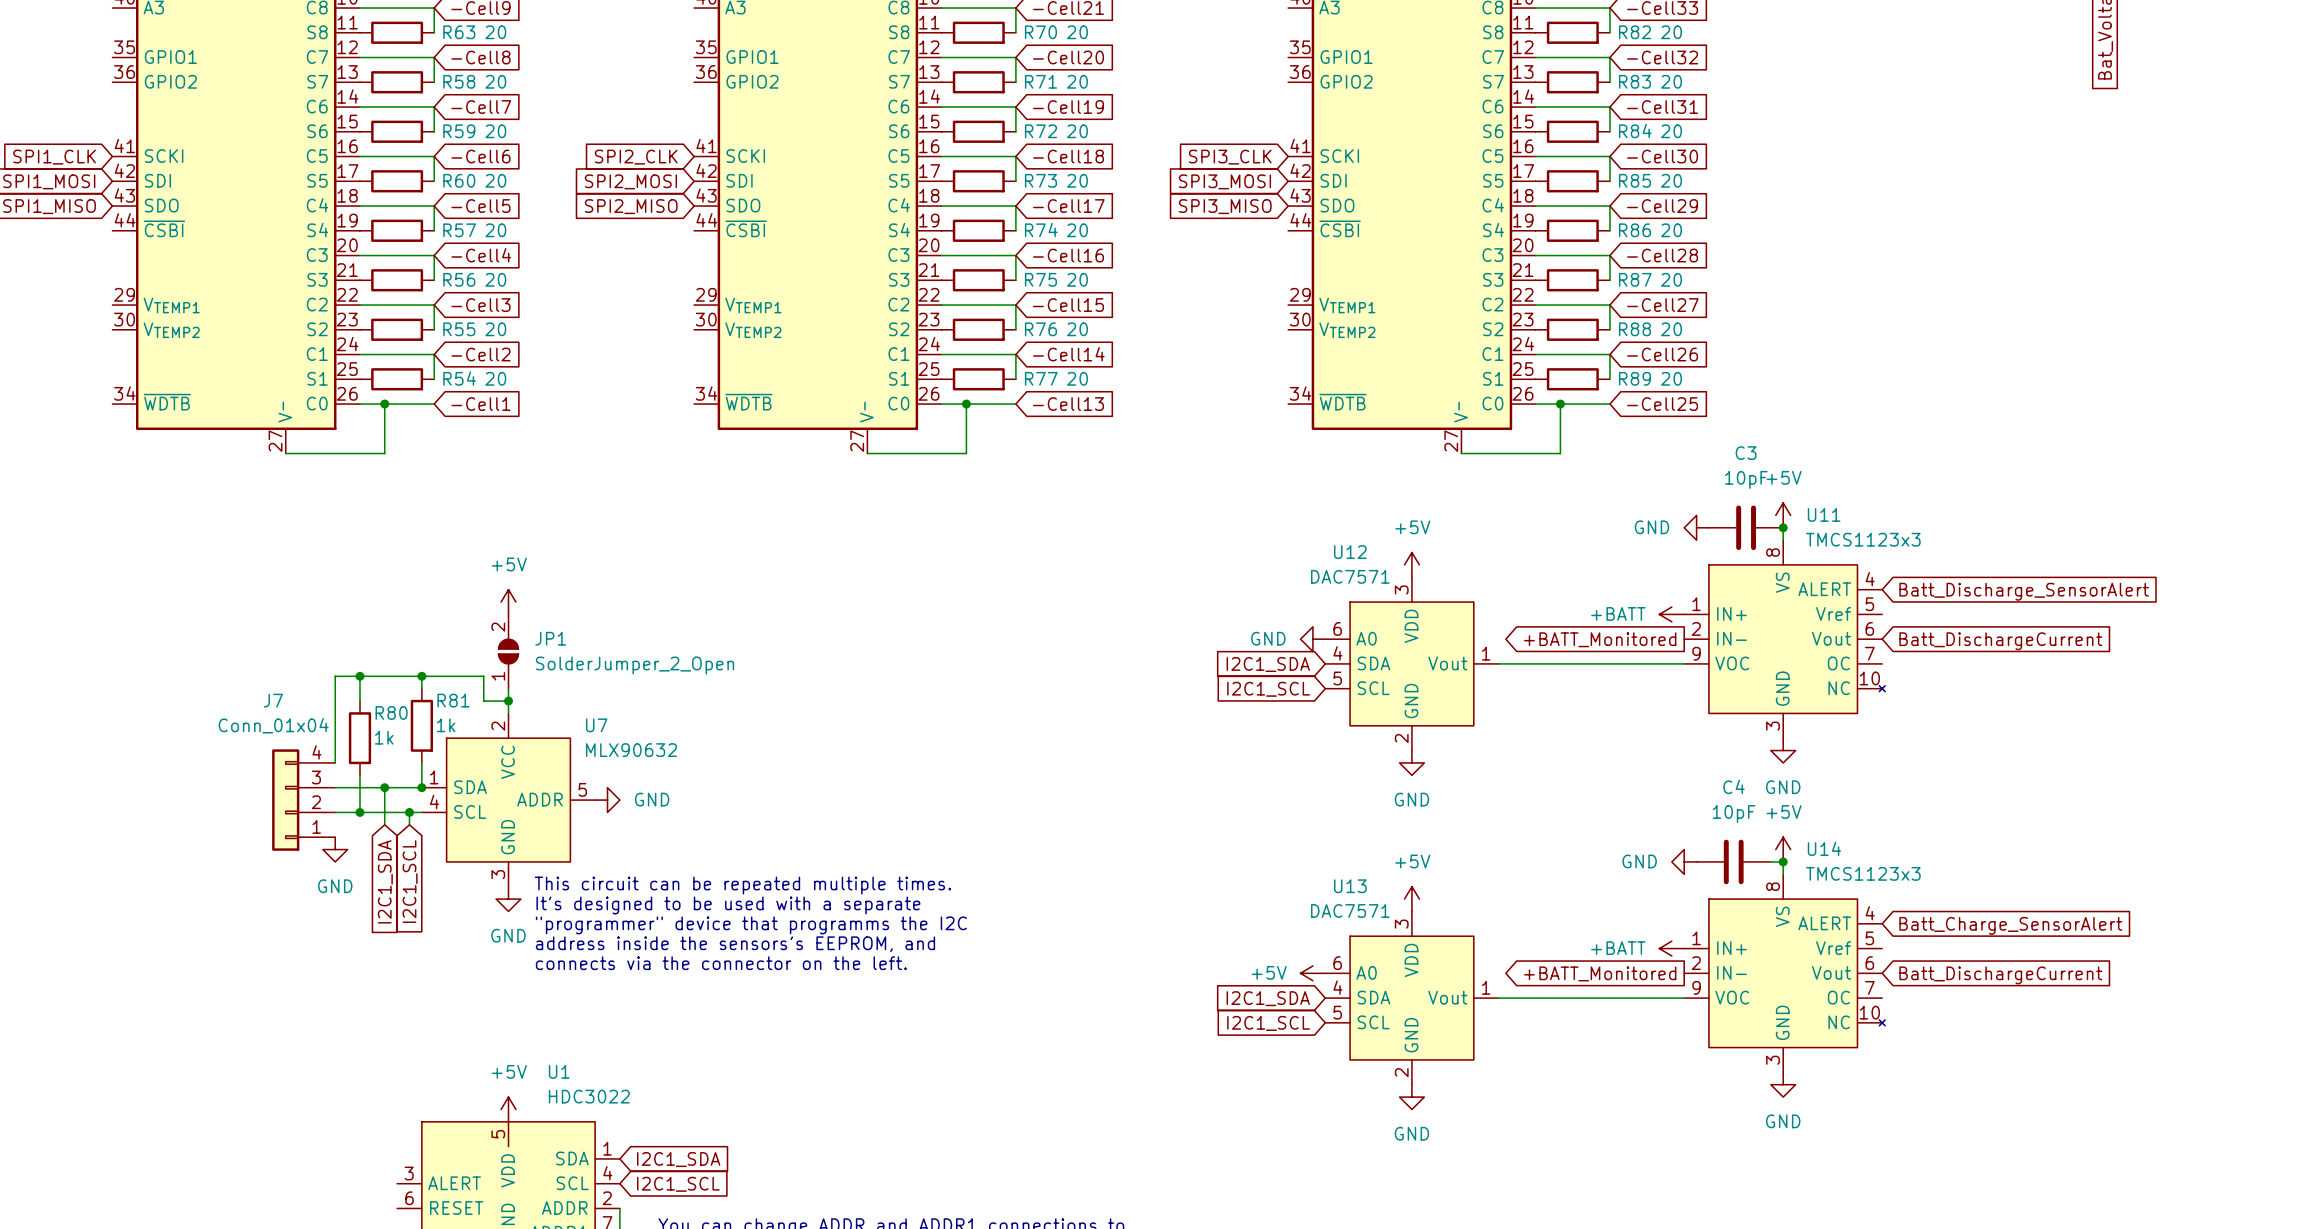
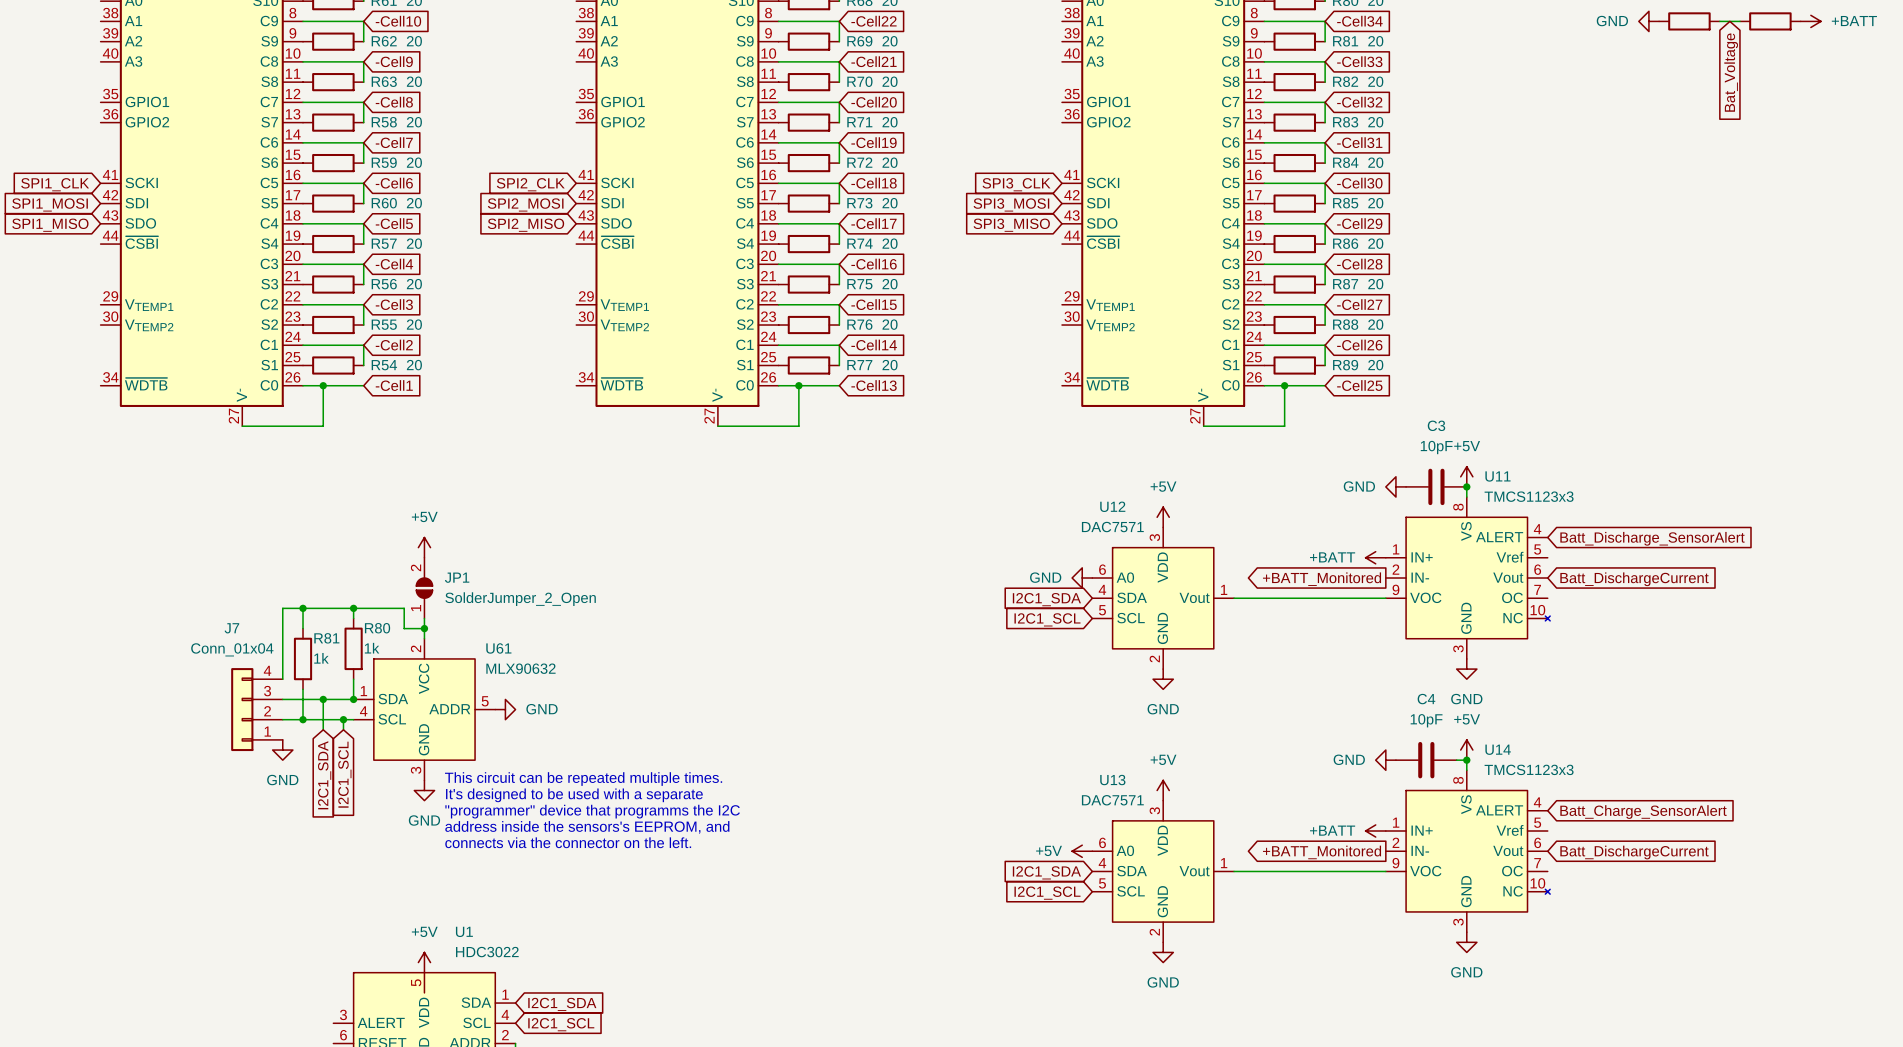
R81 name: R81 (453, 700) -> R80 (377, 628)
R80 name: R80 (391, 712) -> R81 (326, 638)
U7 name: U7 (596, 725) -> U61 (498, 648)

